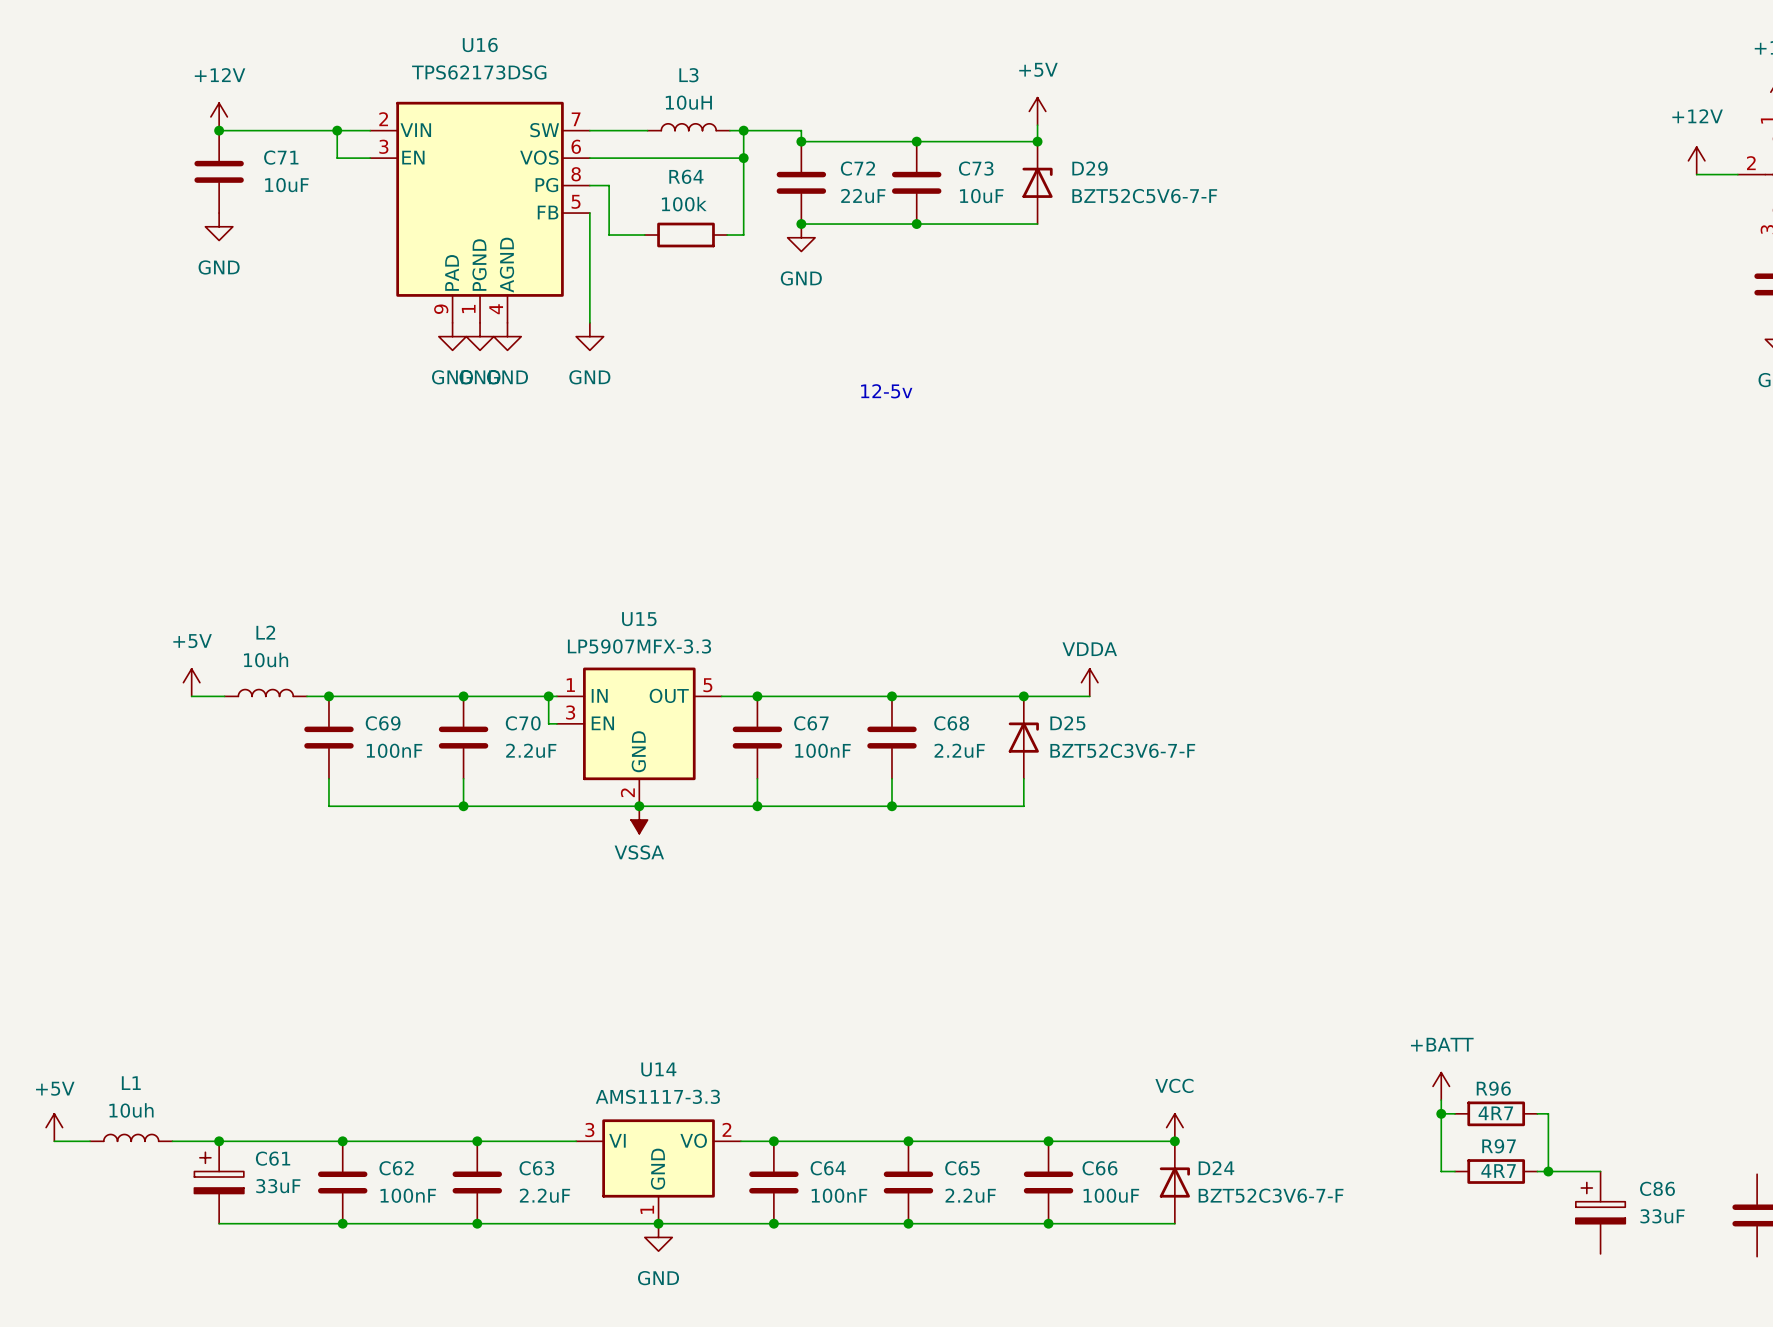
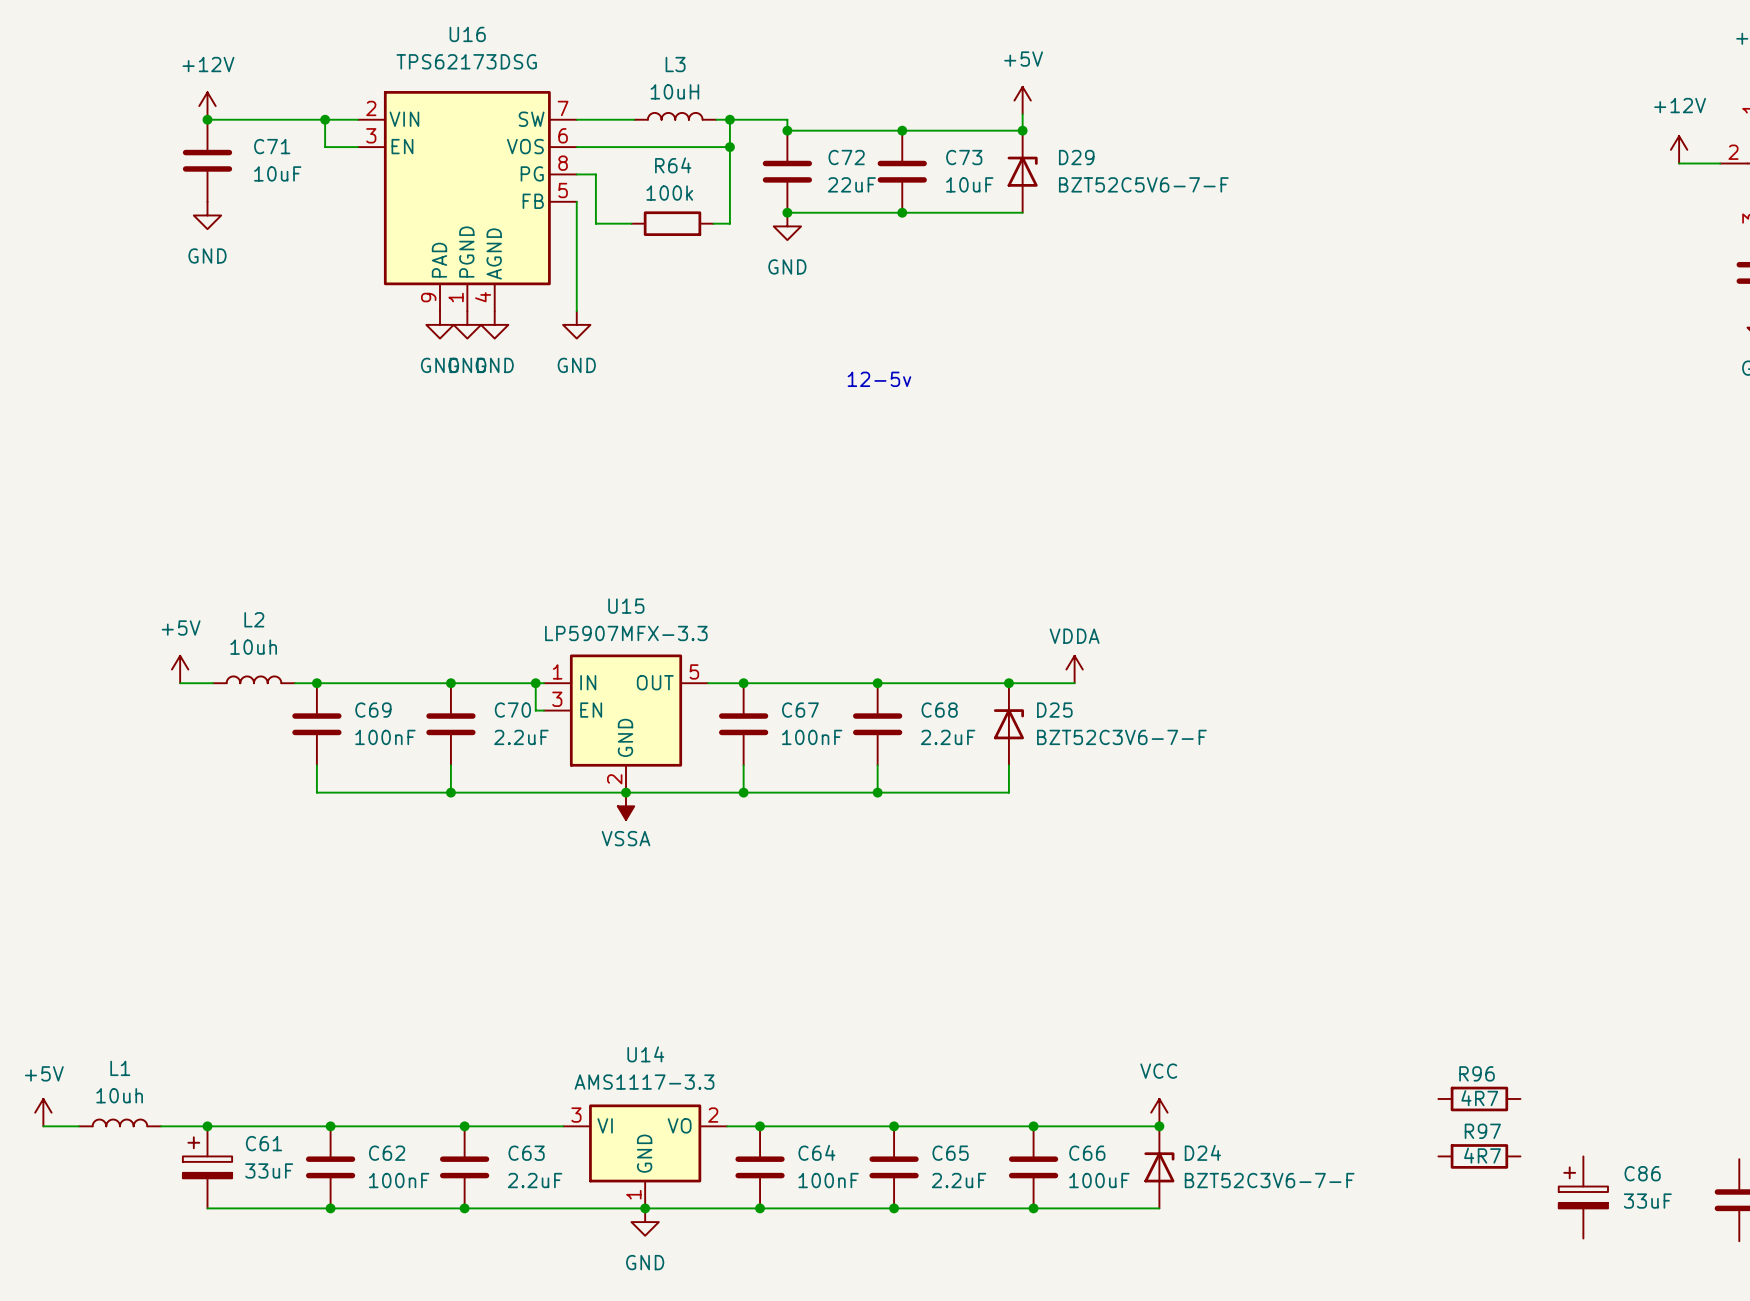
power symbol: +BATT (1441, 1086) -> none
wire: (1441, 1100) (1441, 1171) (1455, 1171) -> none
wire: (1441, 1113) (1455, 1113) -> none
junction: (1441, 1113) -> none
wire: (1537, 1113) (1548, 1113) (1548, 1171) -> none
wire: (1537, 1171) (1600, 1171) -> none
junction: (1548, 1171) -> none

